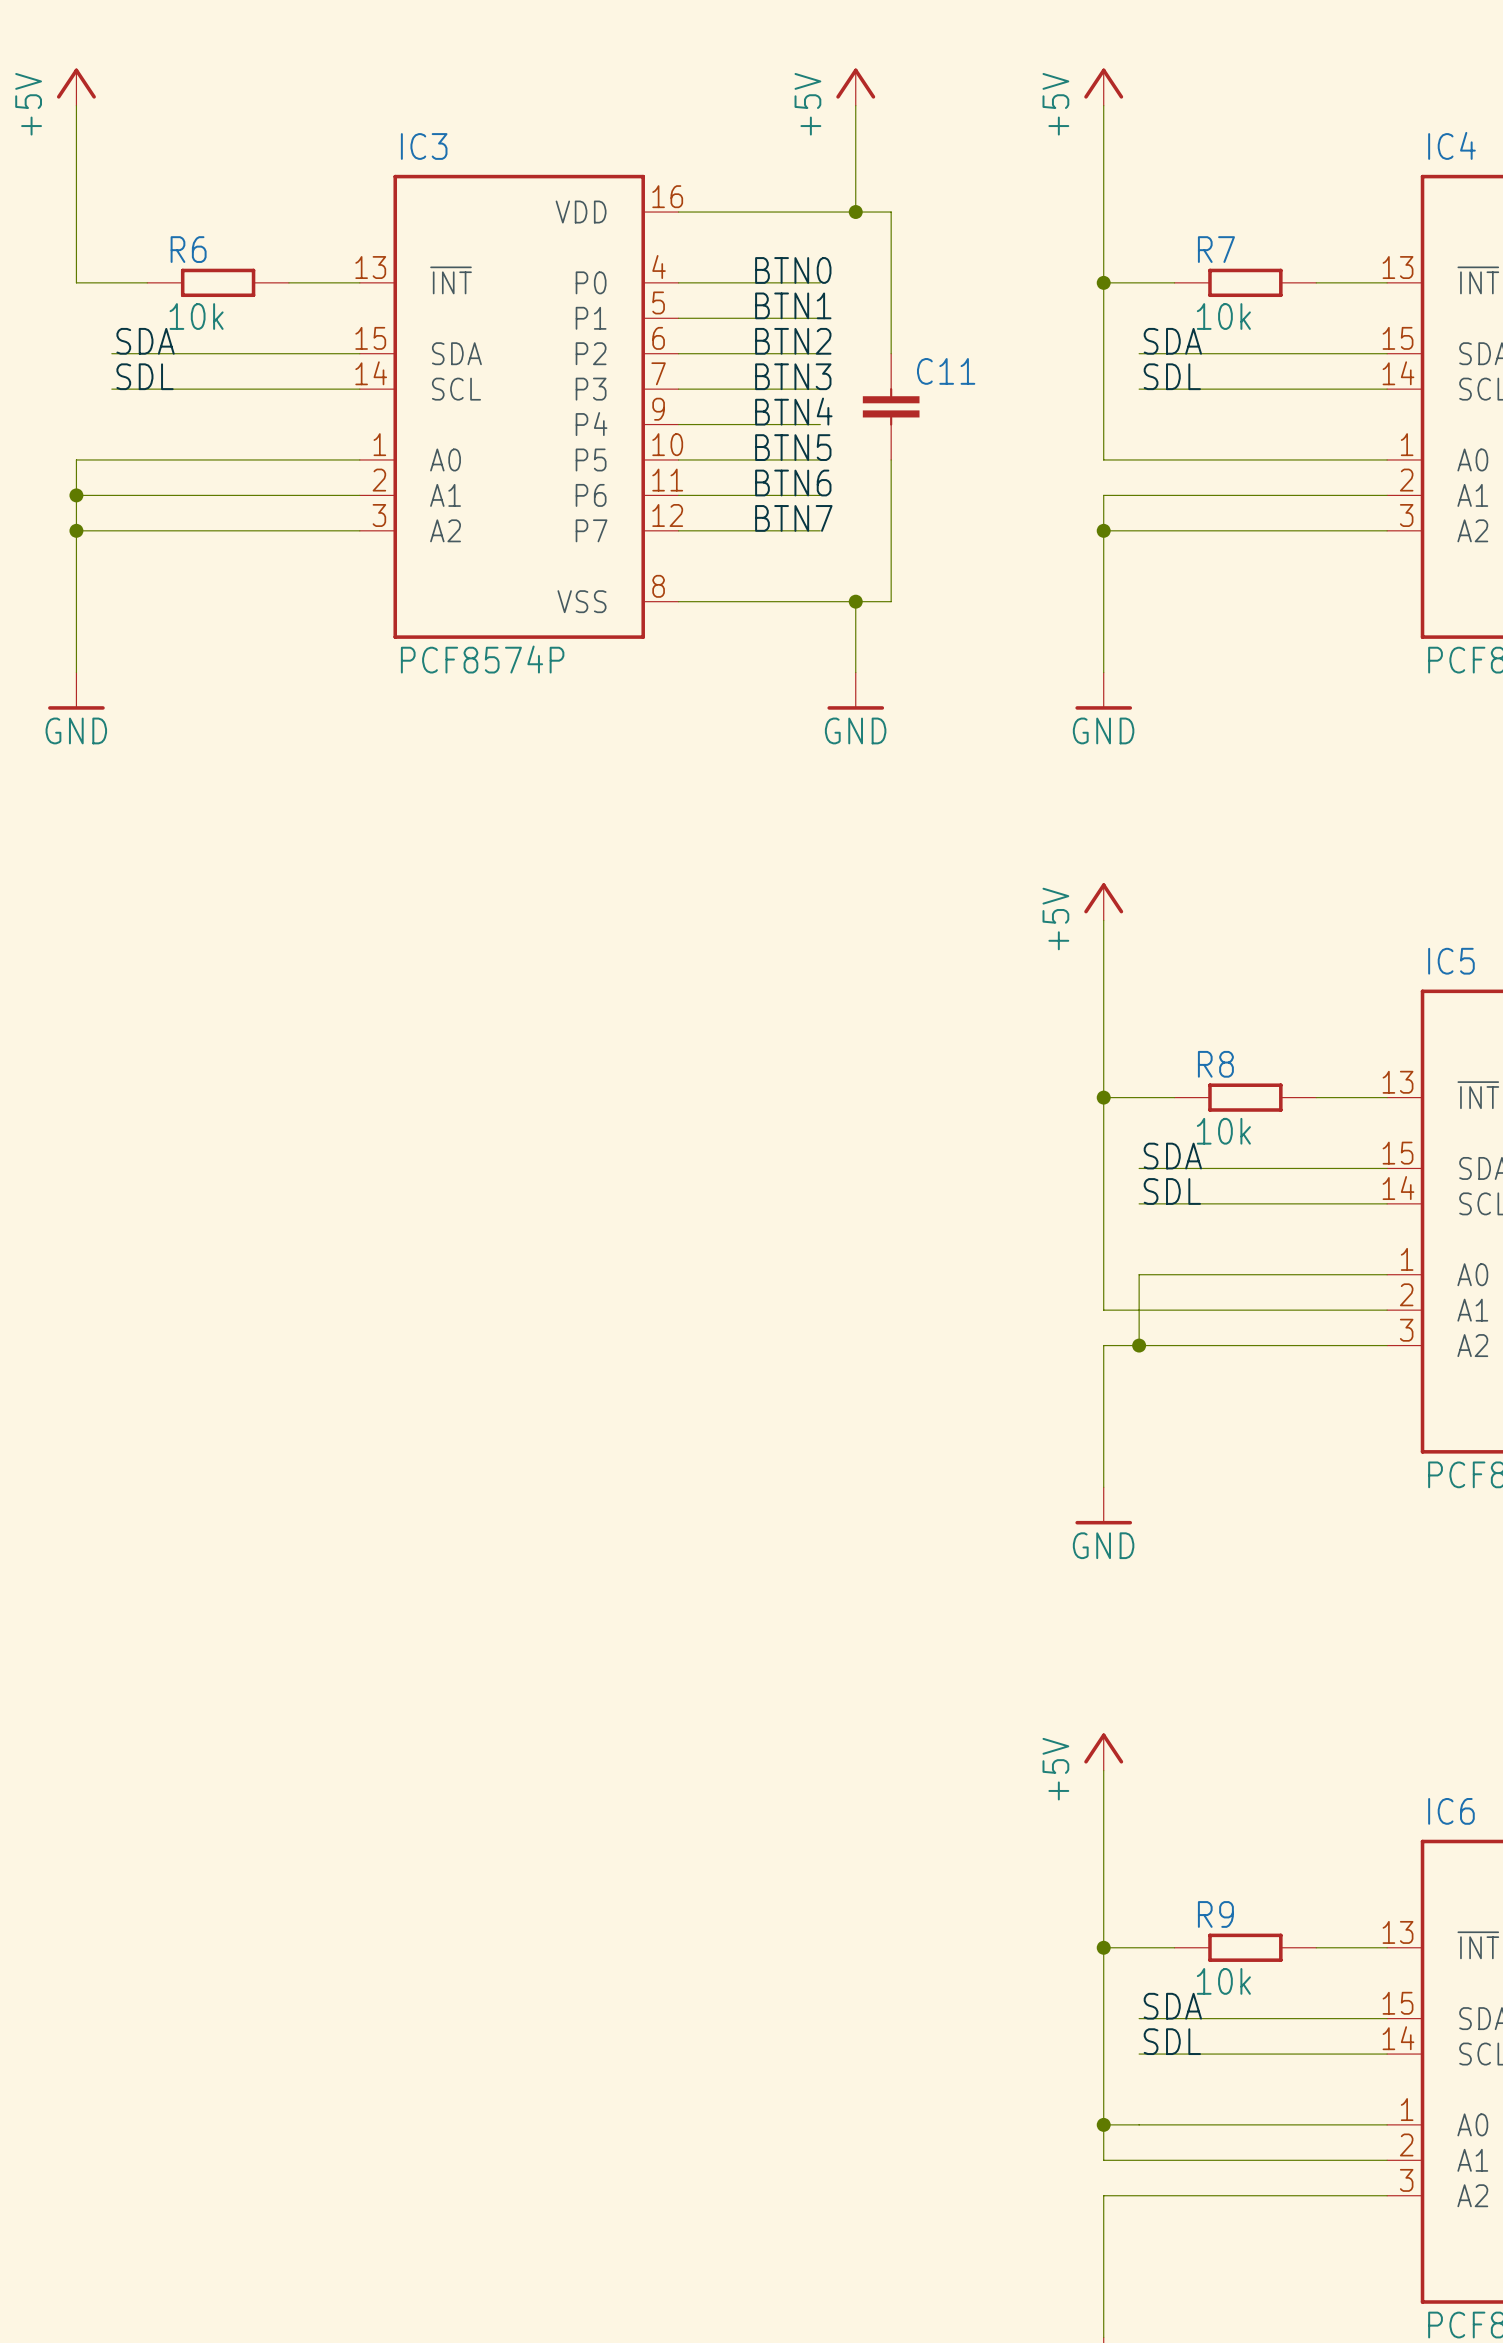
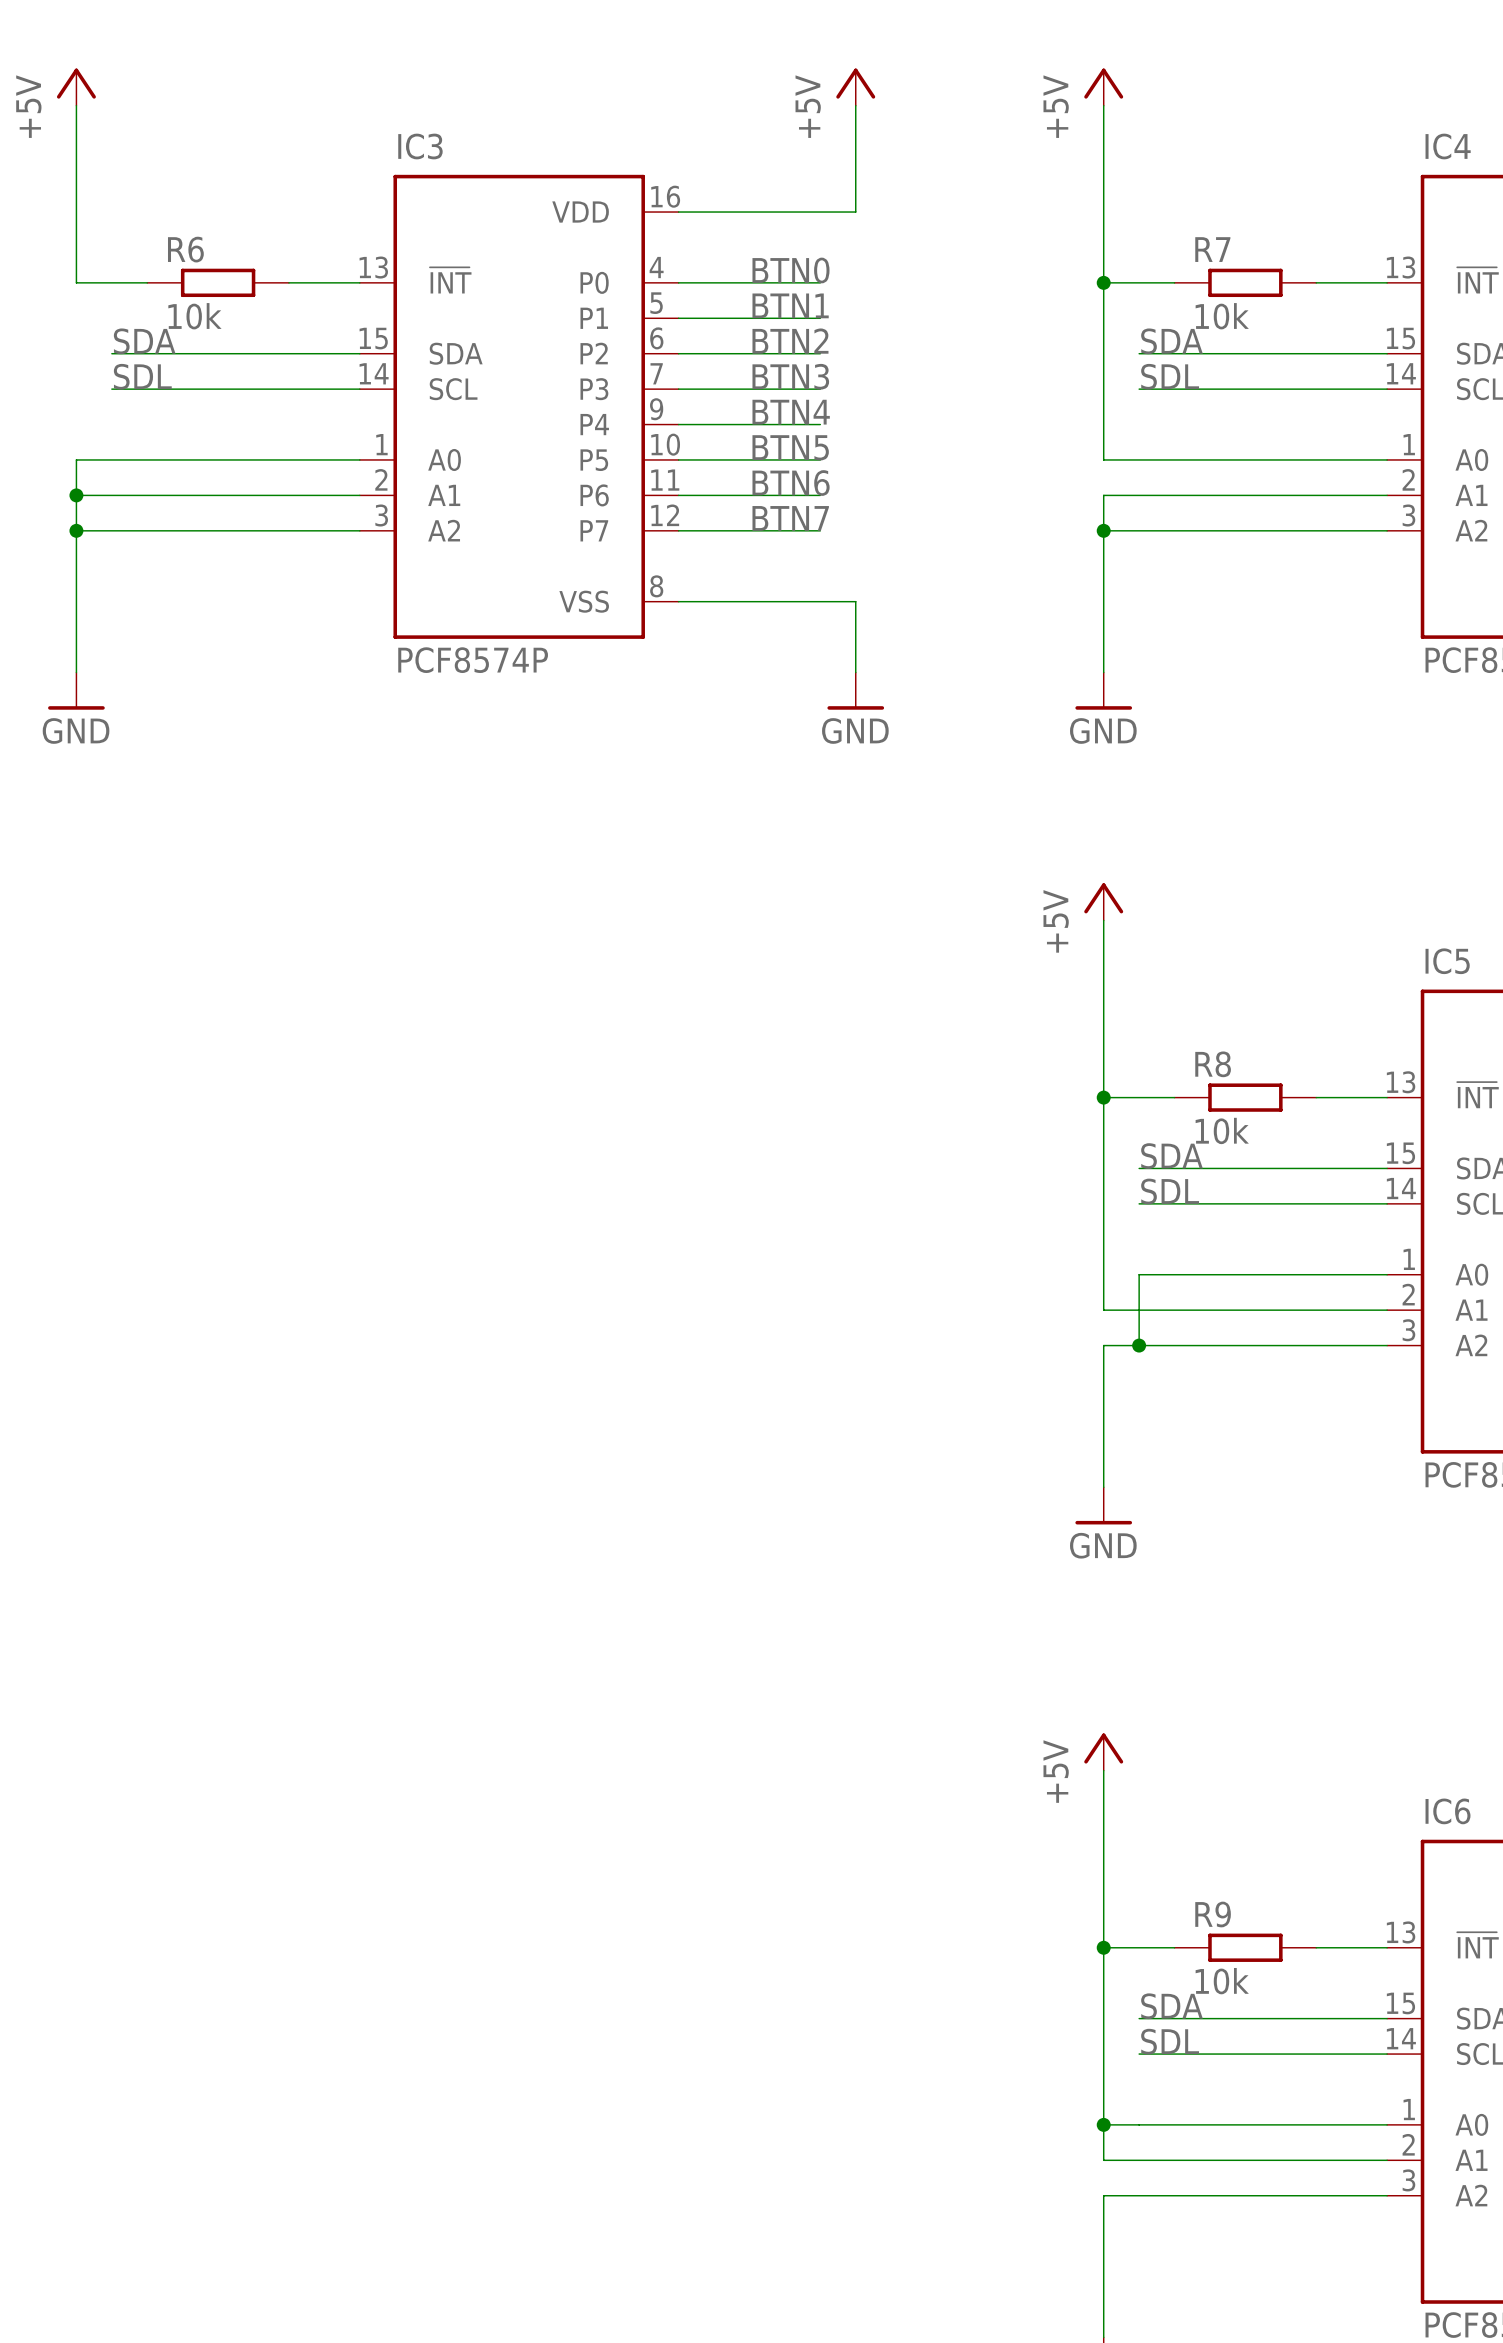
wire: (855, 212) (891, 212) (891, 353) -> none
junction: (855, 212) -> none
C11: (891, 406) -> none
wire: (891, 459) (891, 601) (855, 601) -> none
junction: (855, 601) -> none

